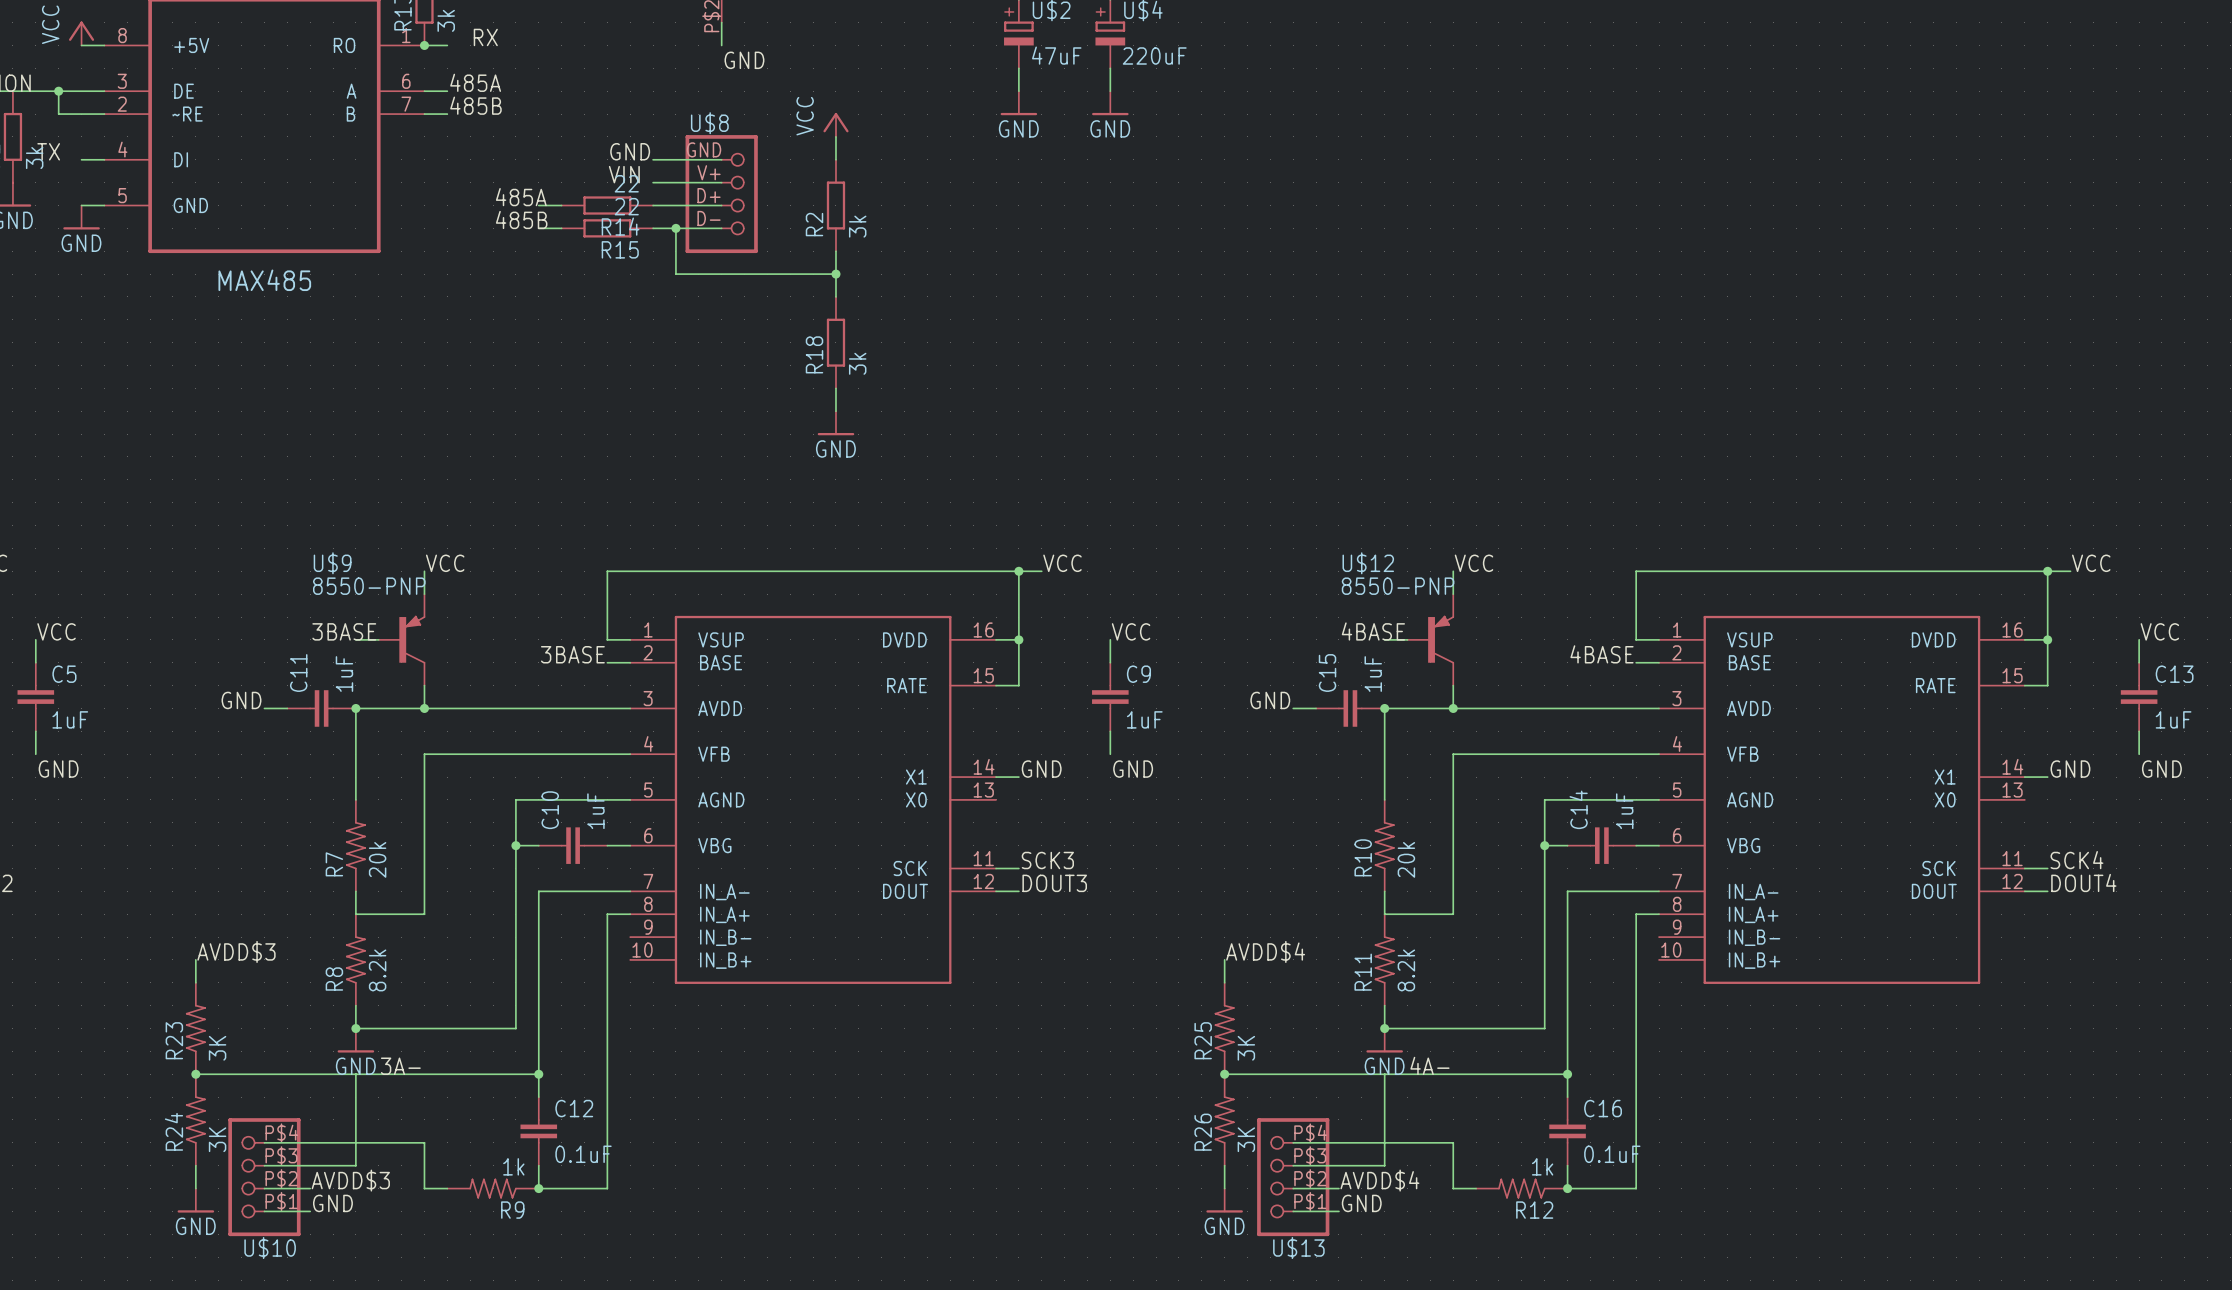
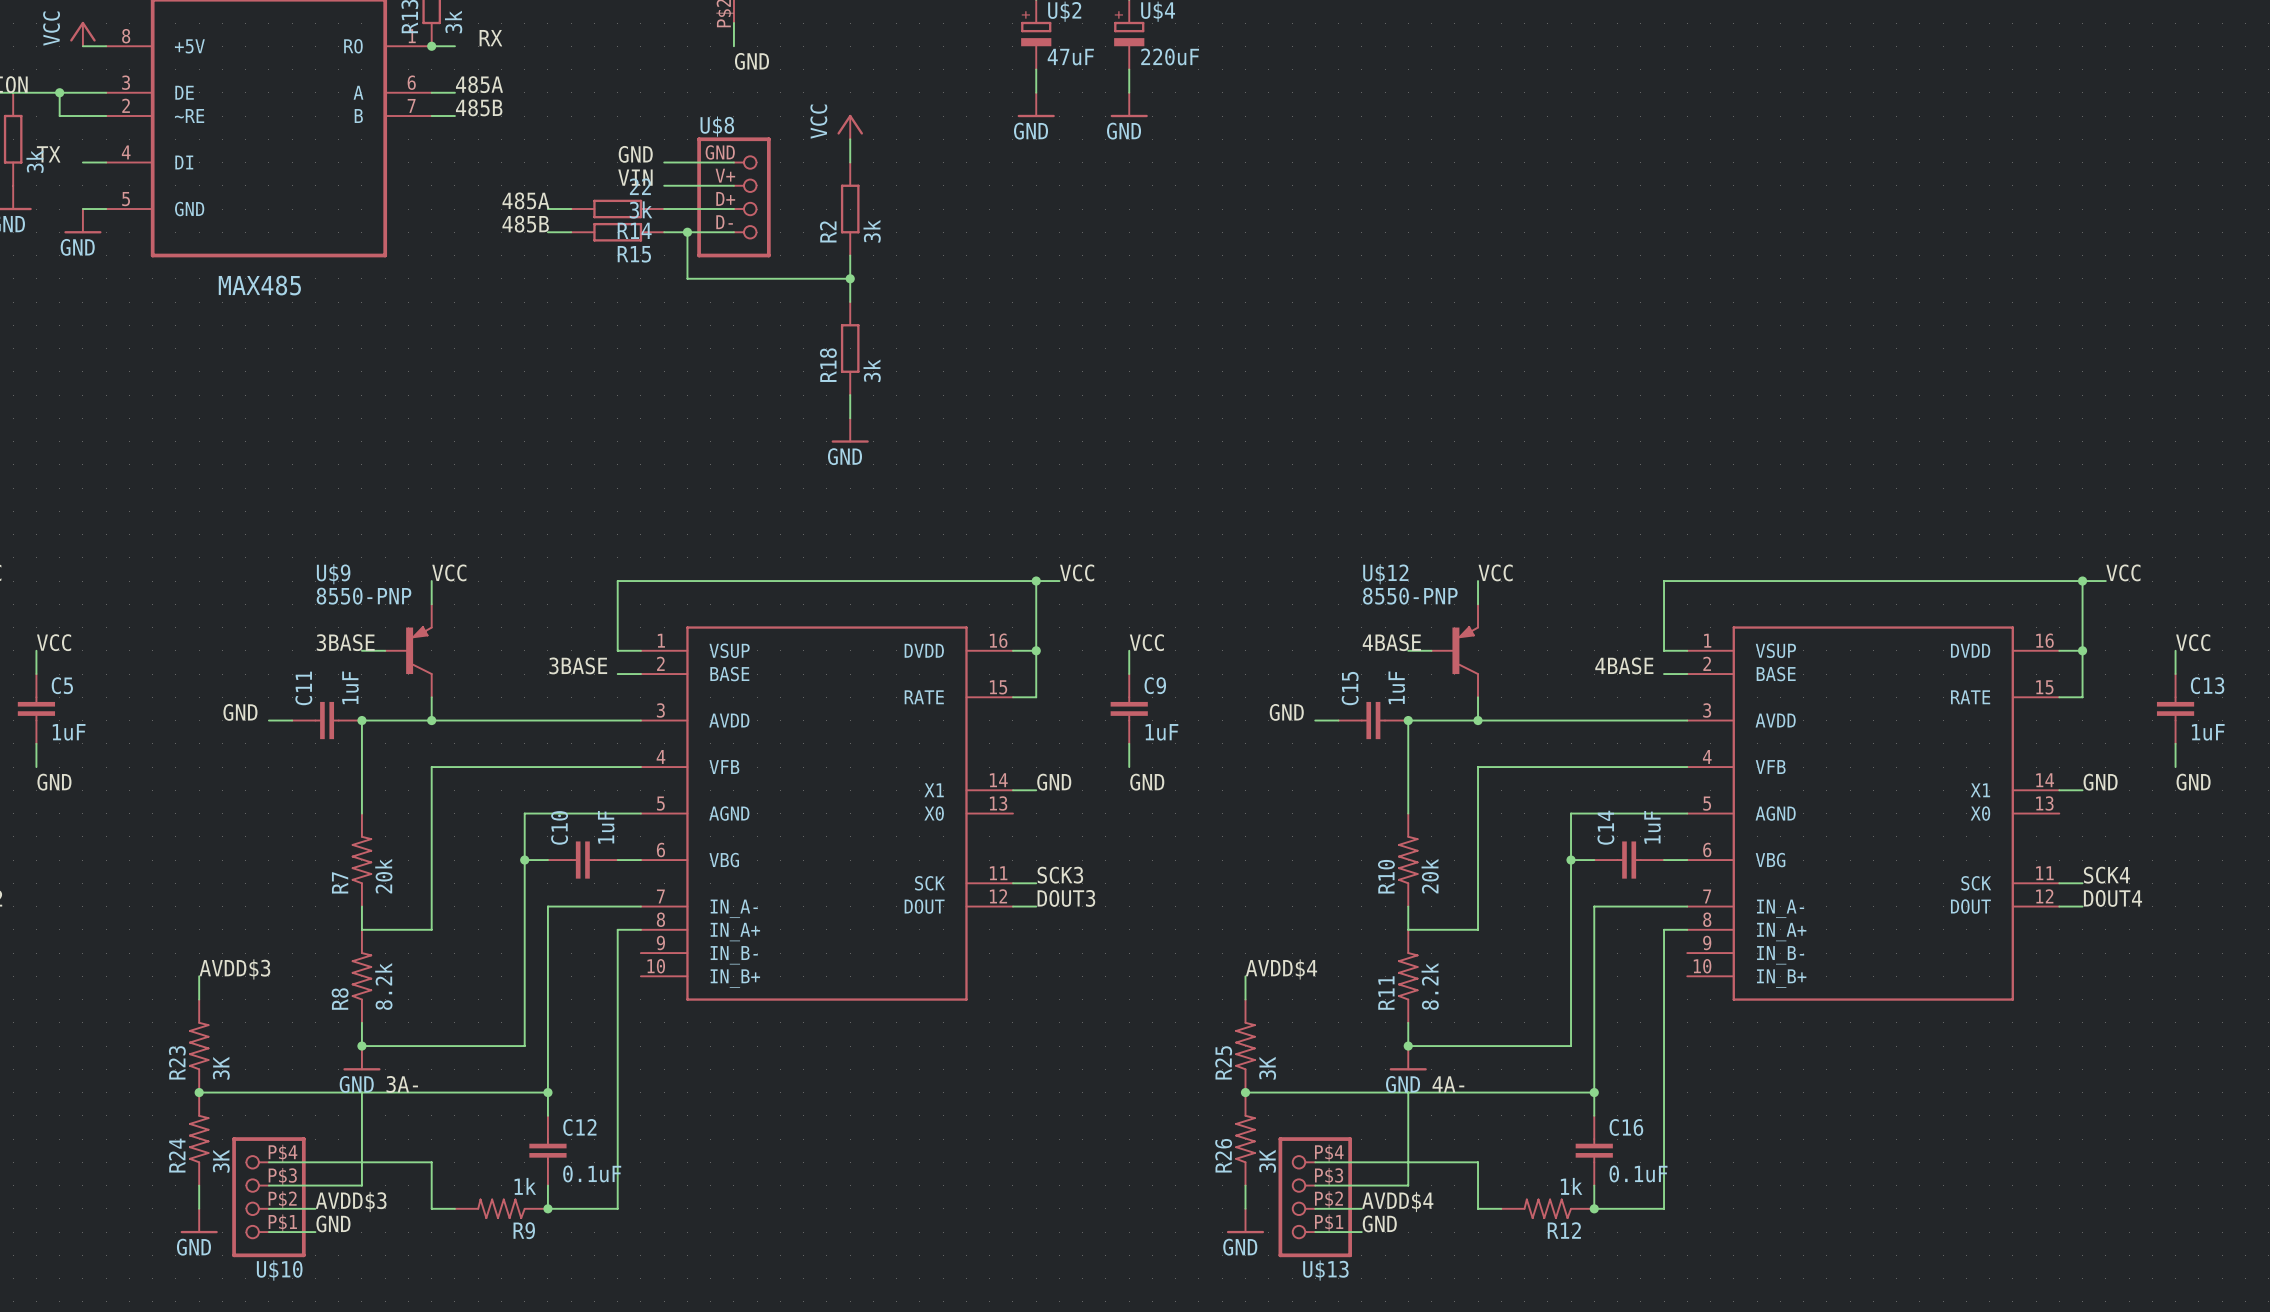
R15 value: 22 (626, 206) -> 3k (641, 209)

